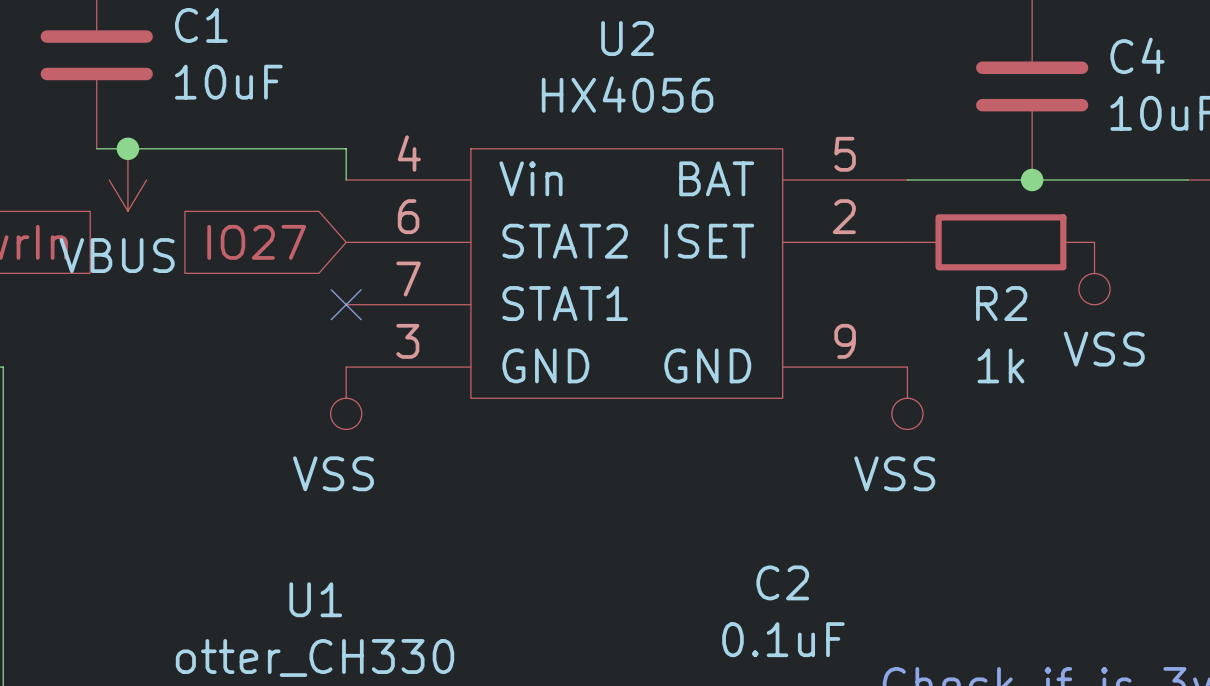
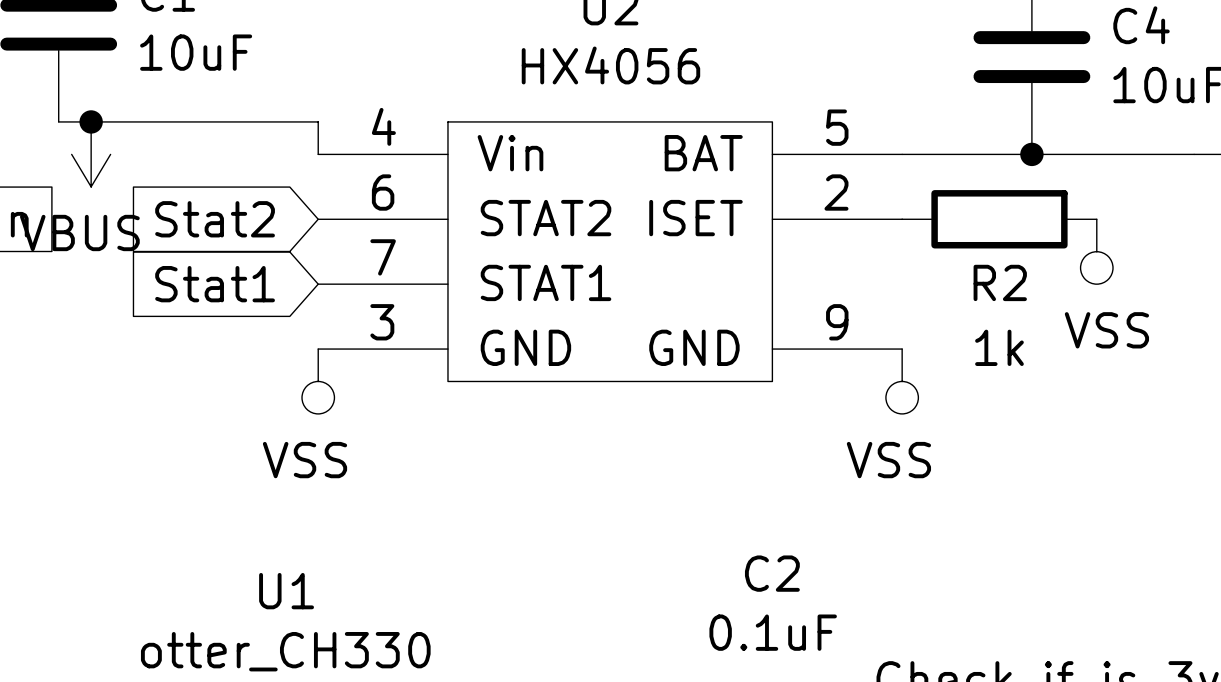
global label: IO27 (256, 242) -> Stat2 (215, 219)
global label: none -> Stat1 (215, 284)
no-connect mark: (346, 304) -> none

